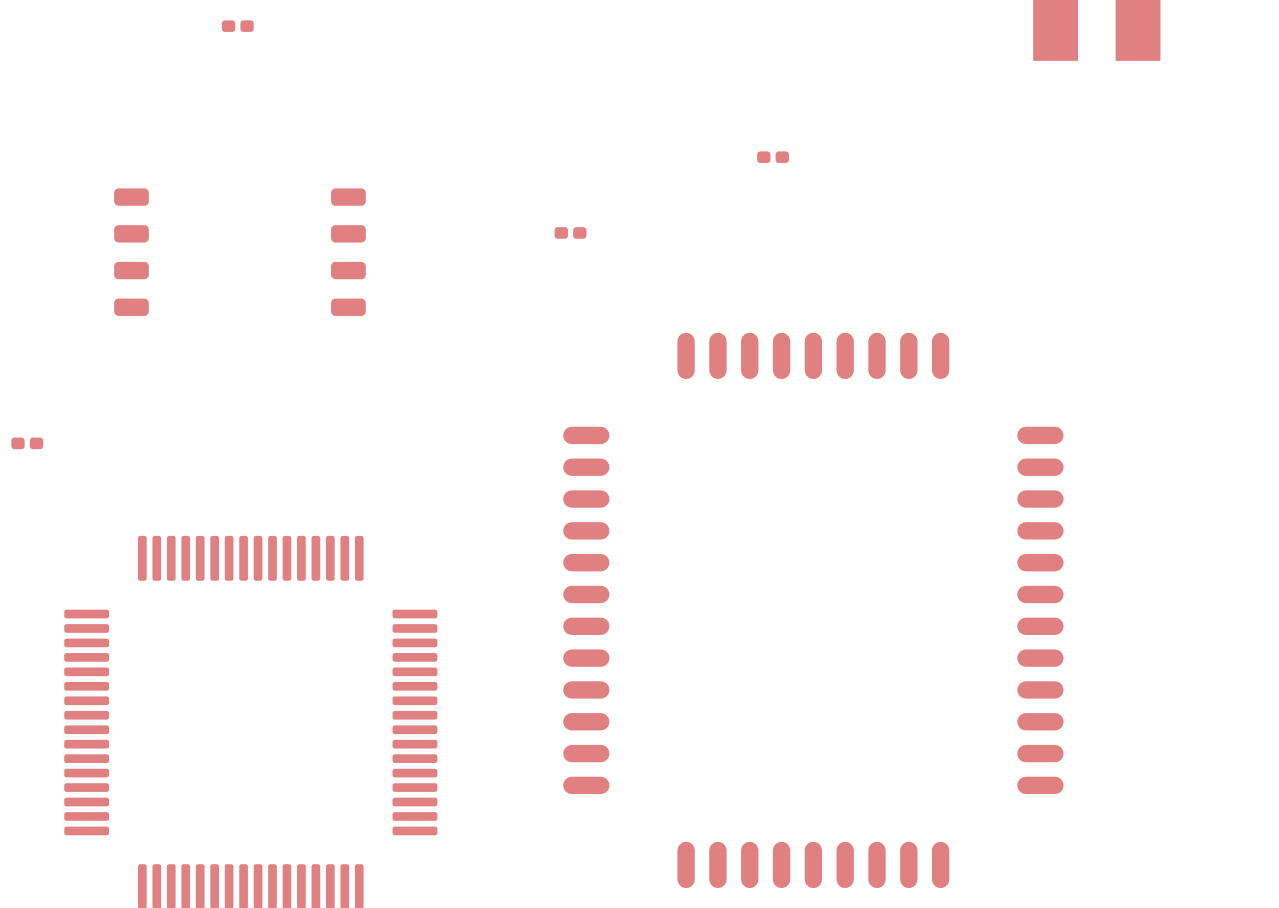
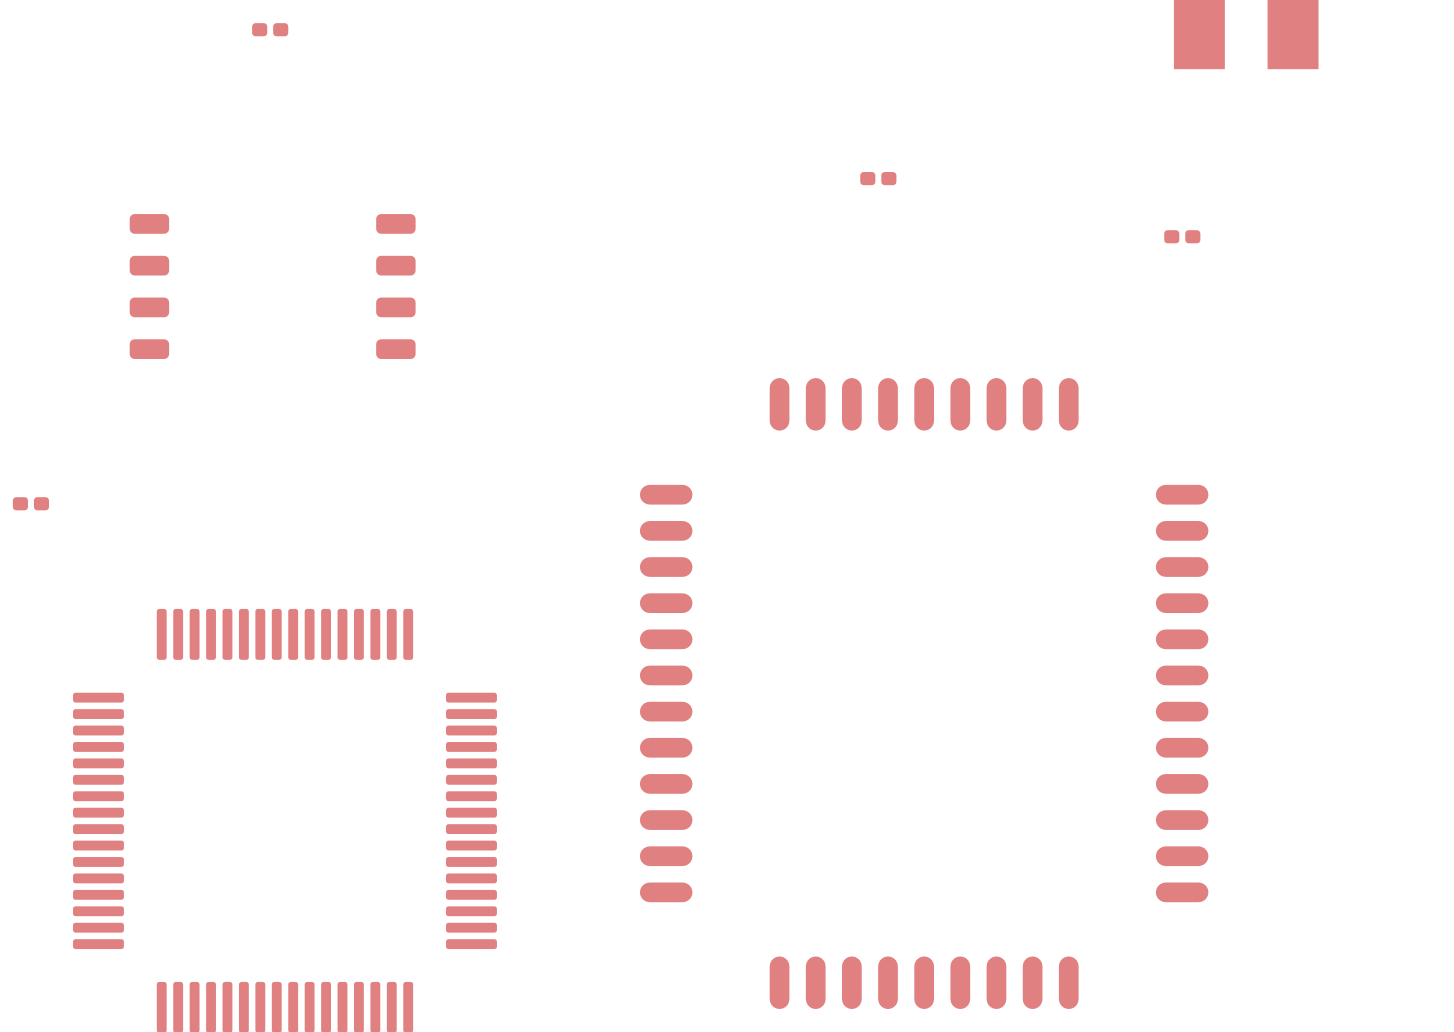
part position: (570, 232) -> (1182, 236)

